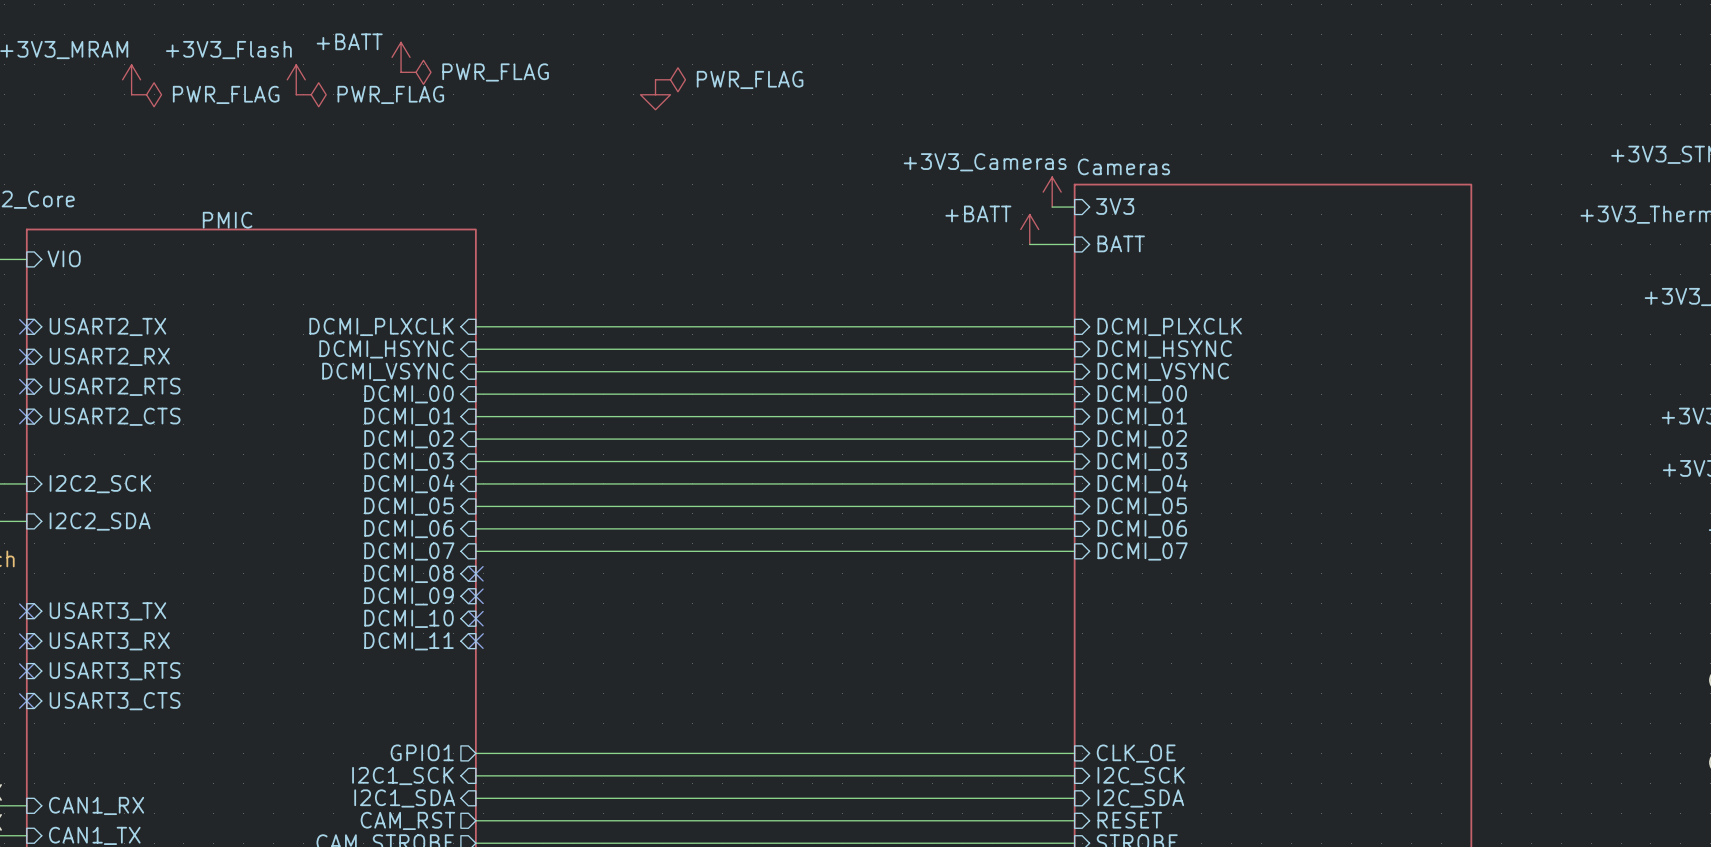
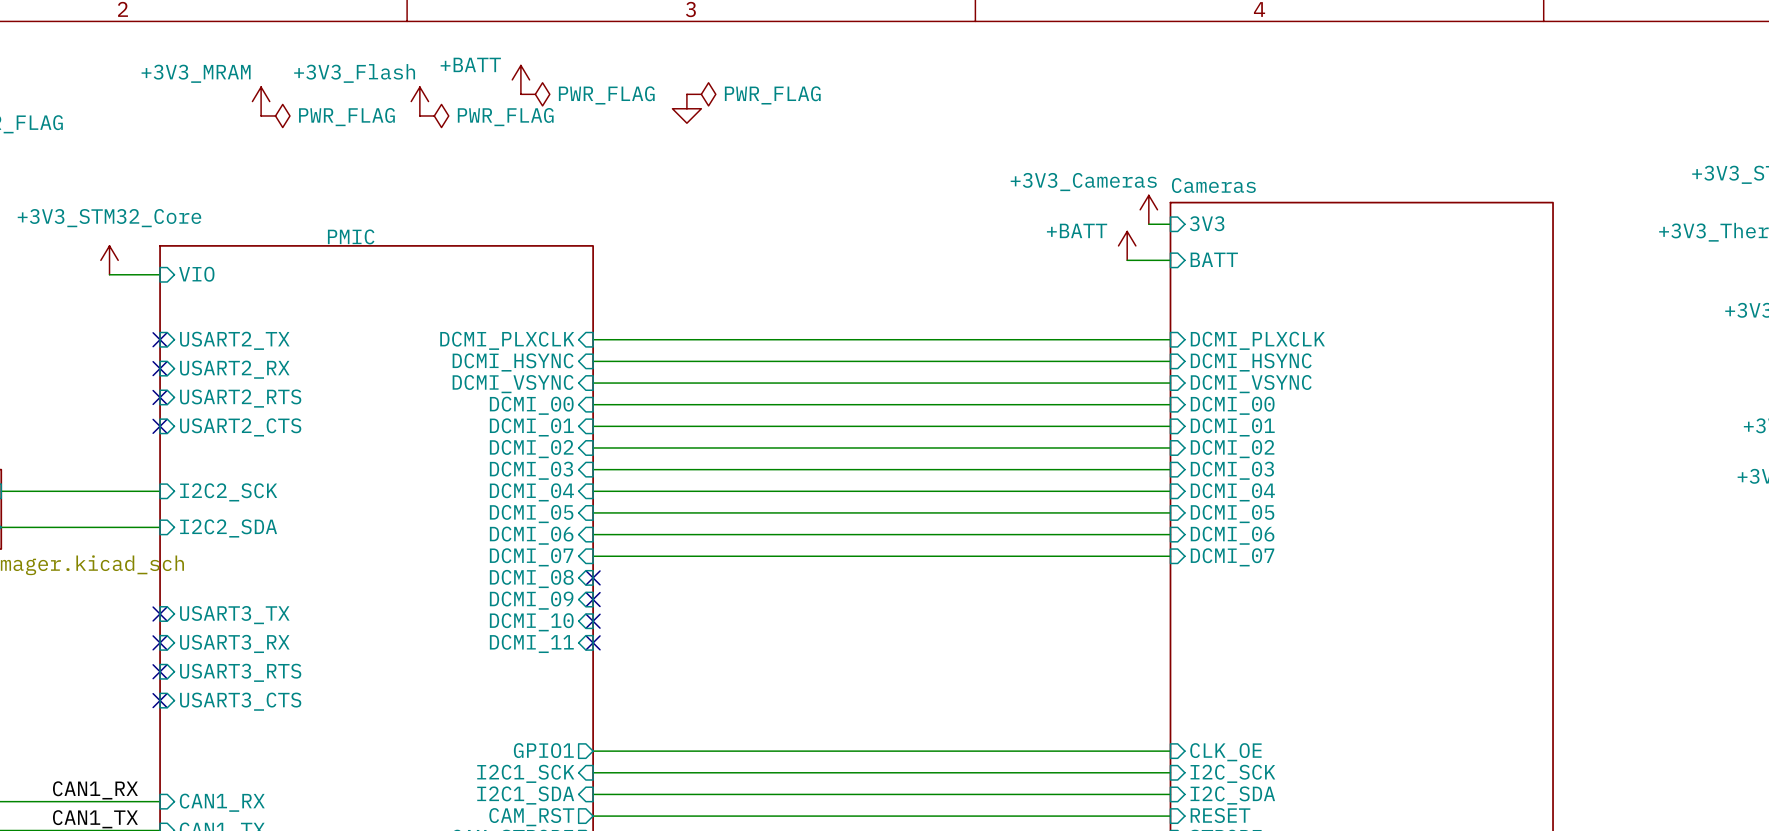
power symbol position: PWR_FLAG (670, 79) -> PWR_FLAG (701, 94)
power symbol position: (655, 94) -> (686, 108)

